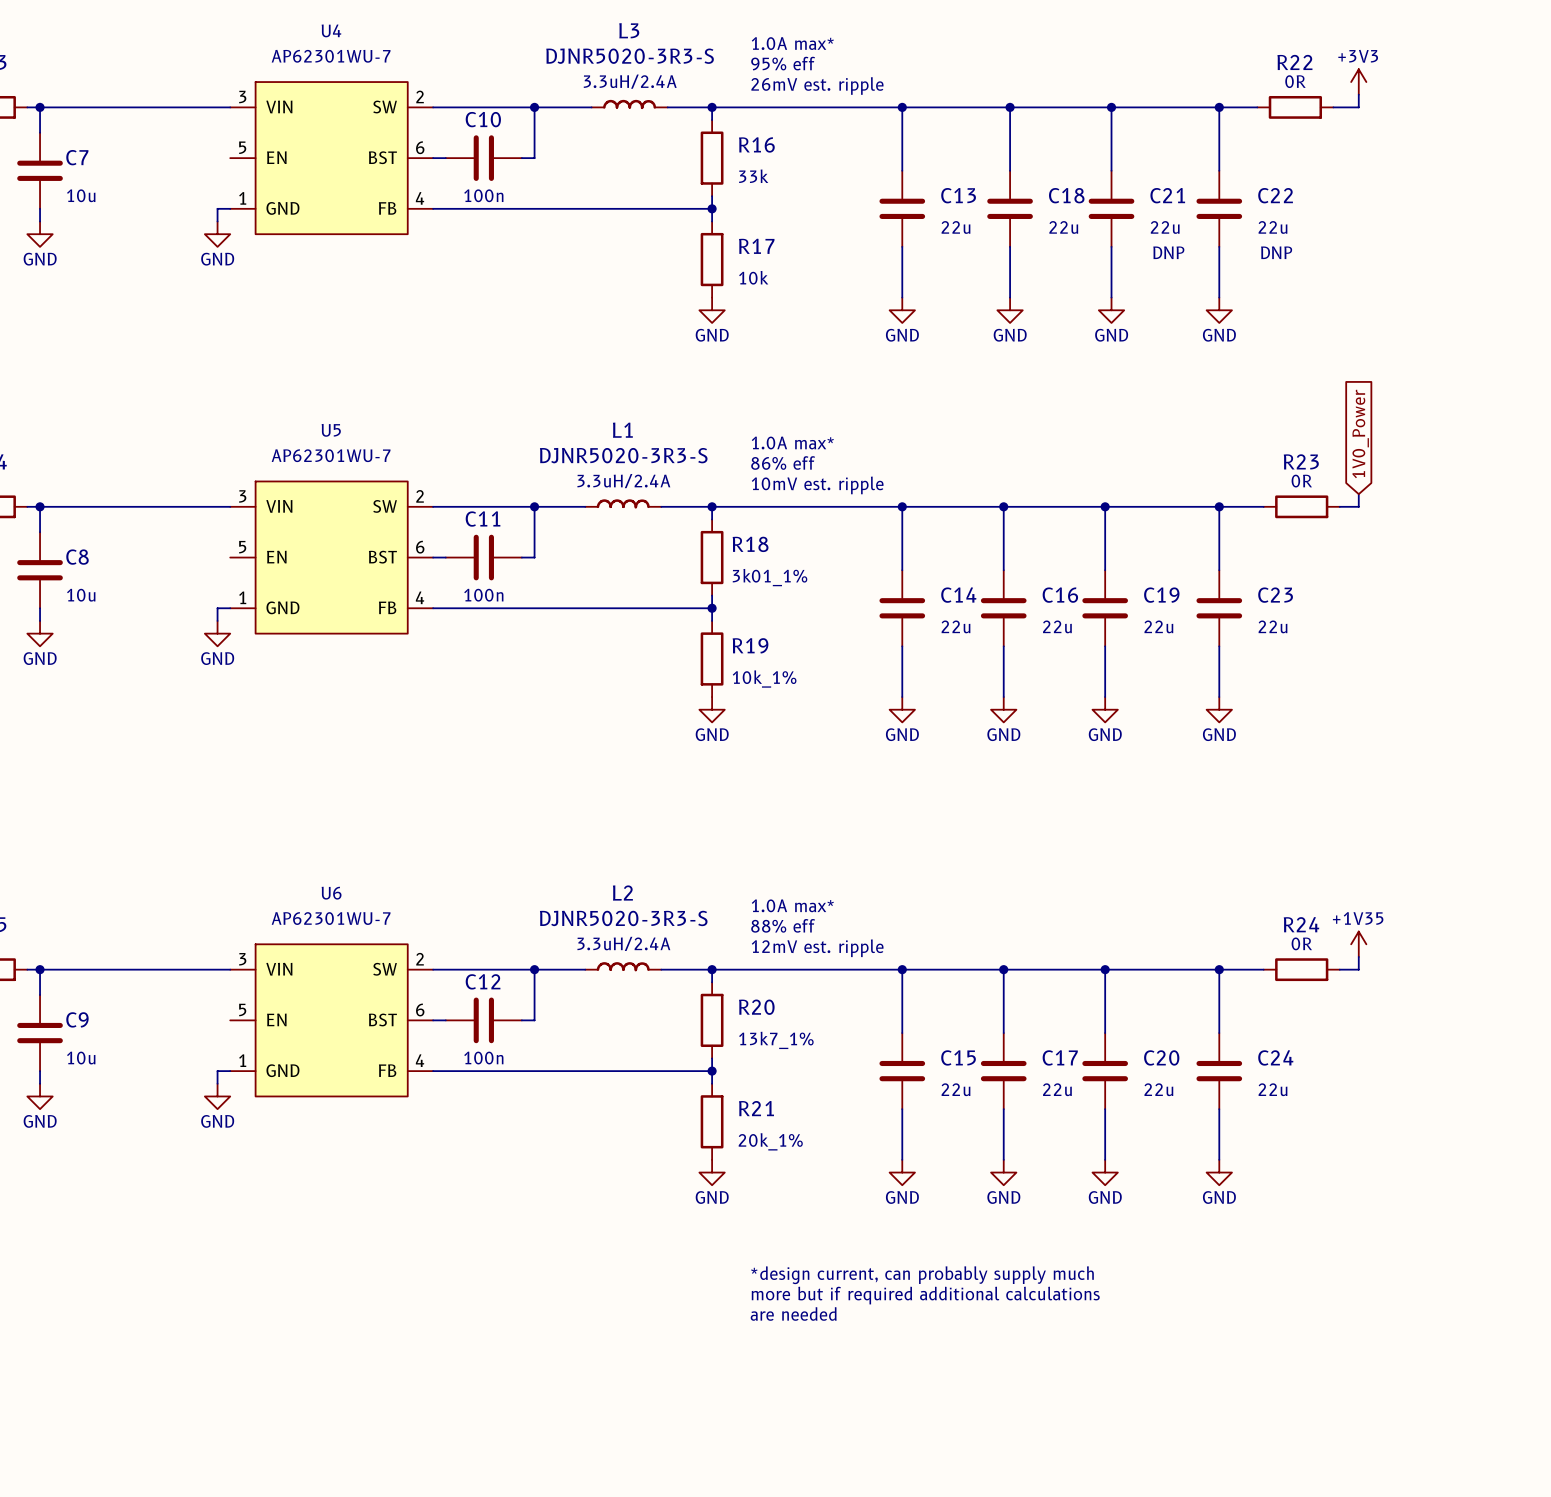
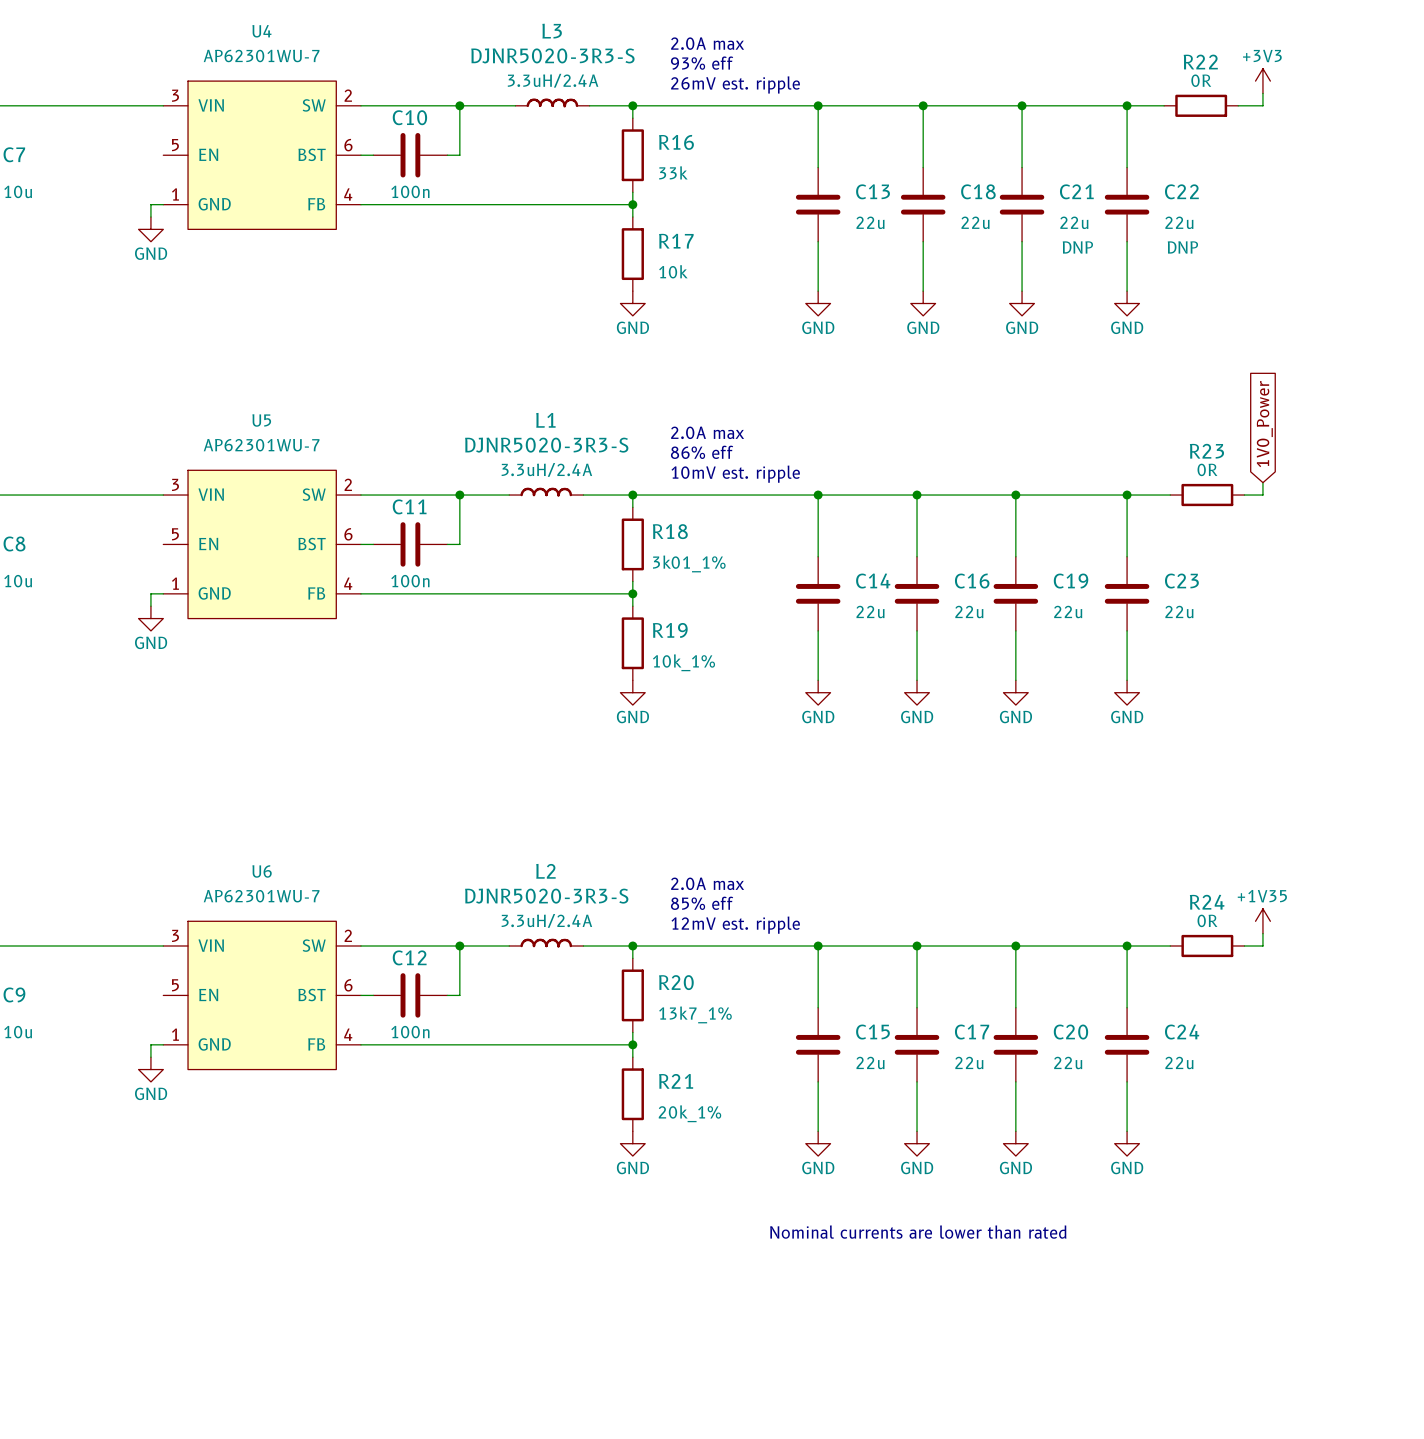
text: 1.0A max* (792, 43) -> 2.0A max (707, 43)
text: 95% eff (783, 63) -> 93% eff (702, 63)
text: 1.0A max* (792, 443) -> 2.0A max (707, 432)
text: 1.0A max* (792, 905) -> 2.0A max (707, 883)
text: 88% eff (783, 925) -> 85% eff (702, 903)
text: none -> Nominal currents are lower than rated (918, 1232)
text: *design current, can probably supply much (922, 1275) -> none
text: more but if required additional calculations (925, 1295) -> none
text: are needed (793, 1313) -> none

